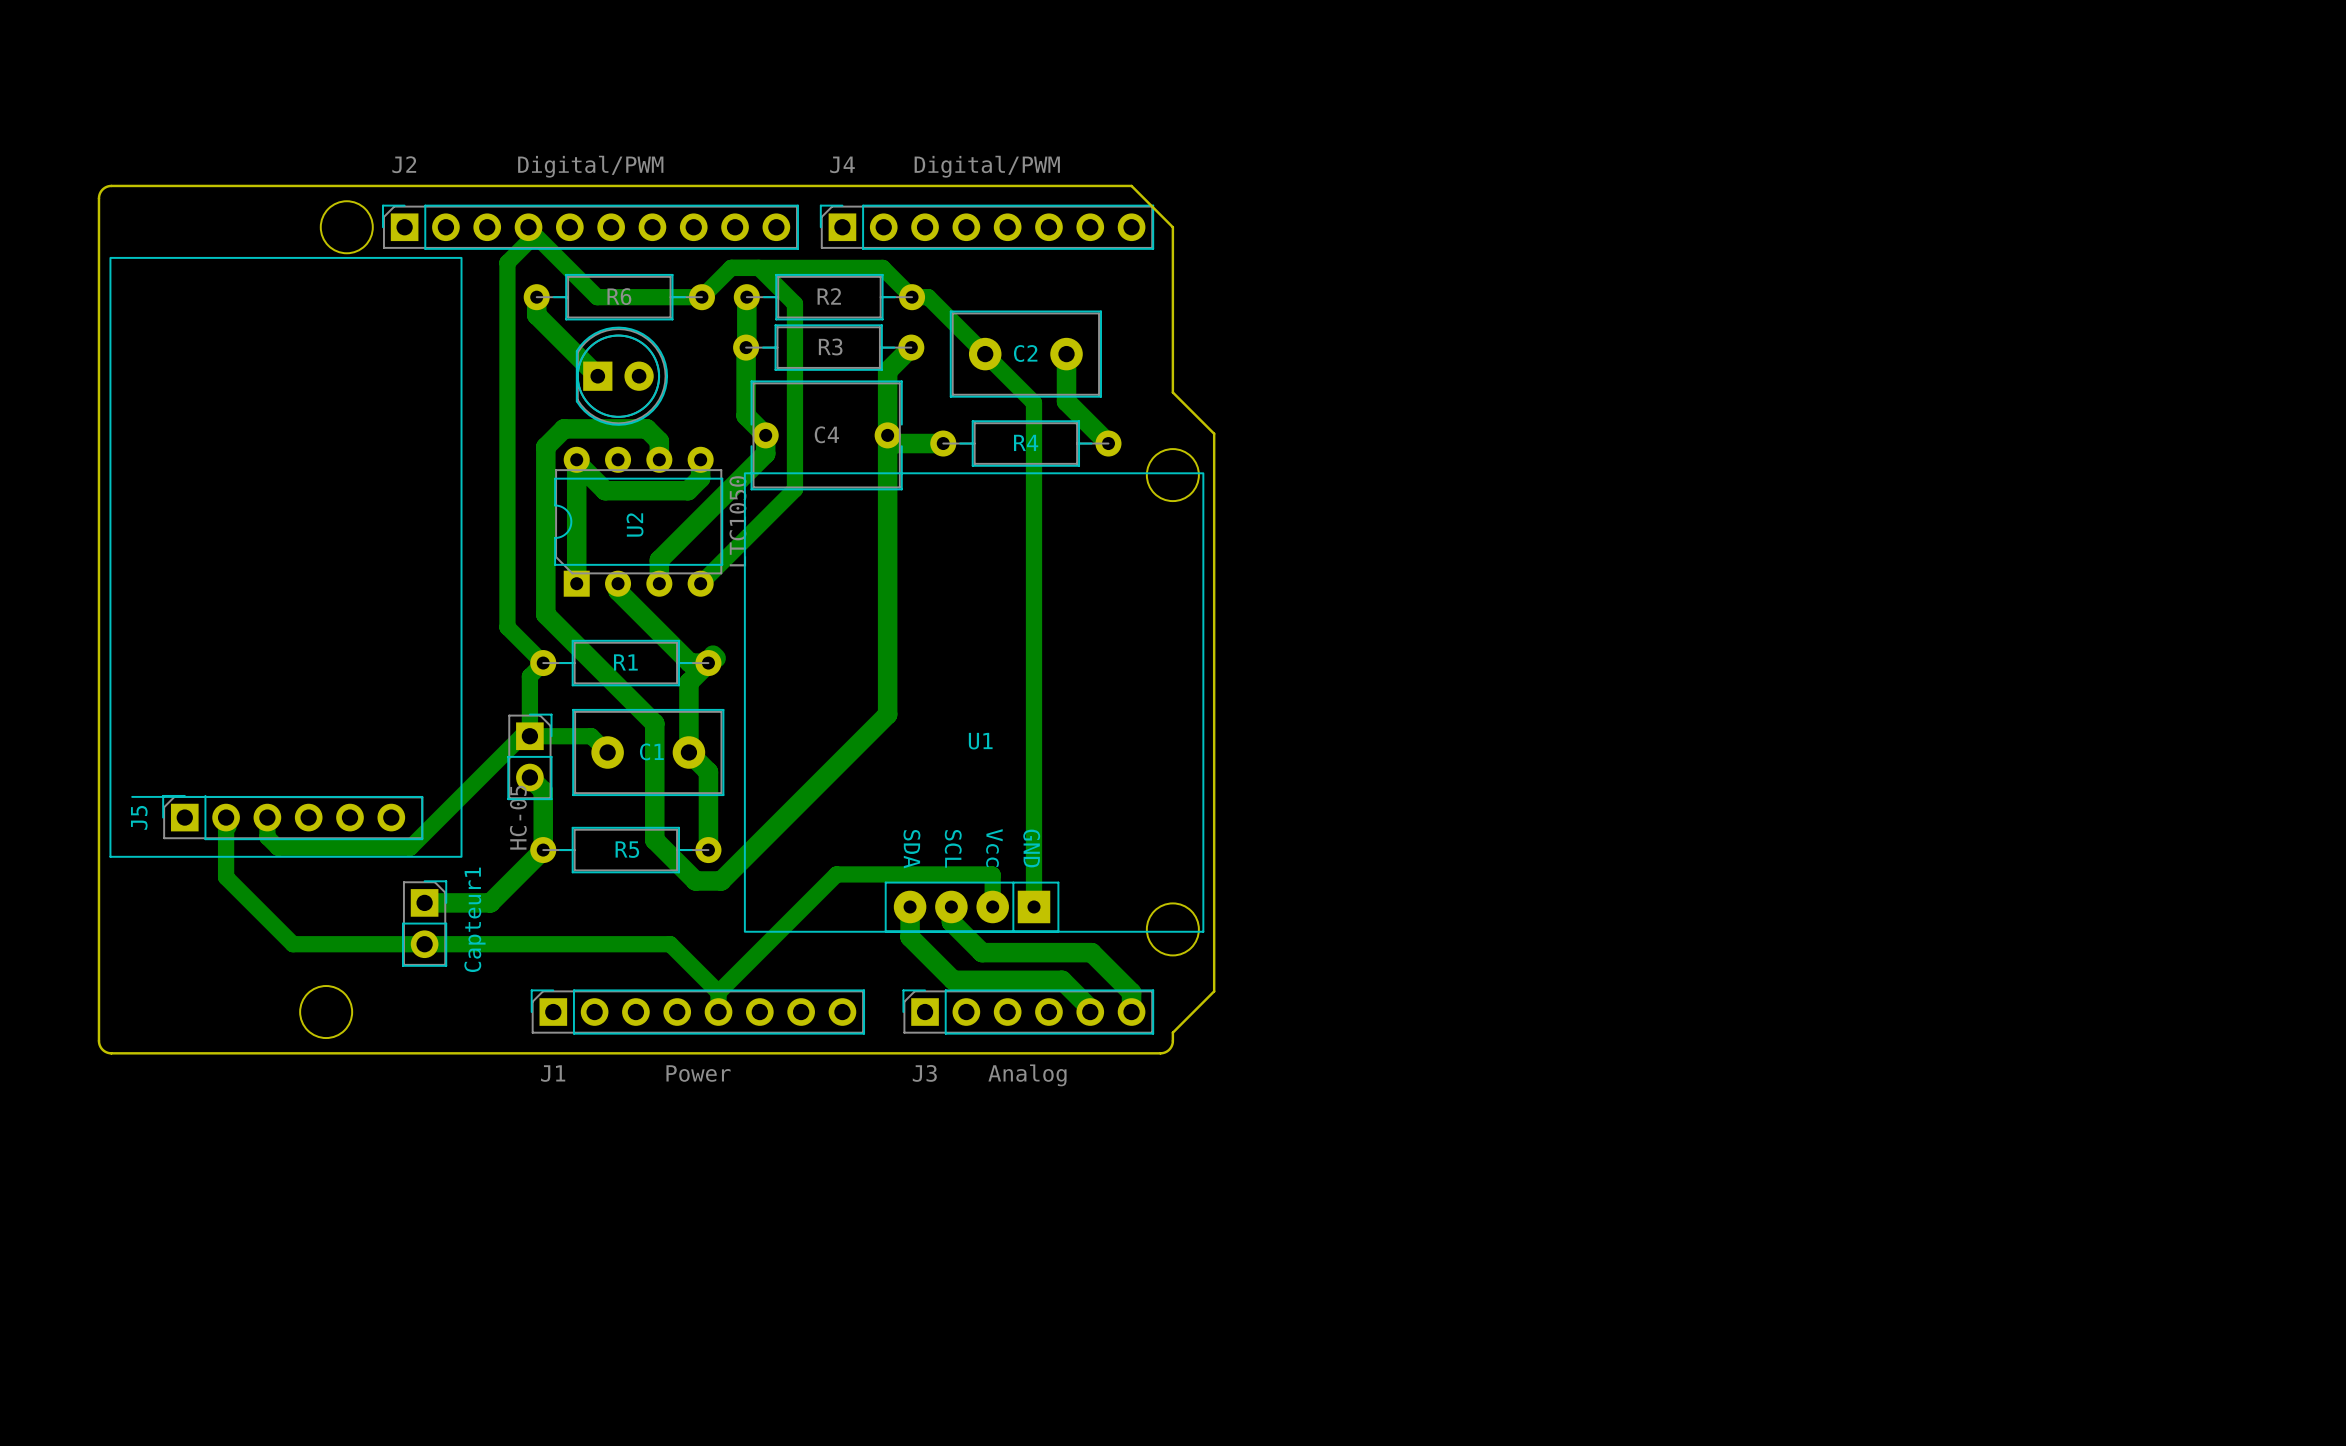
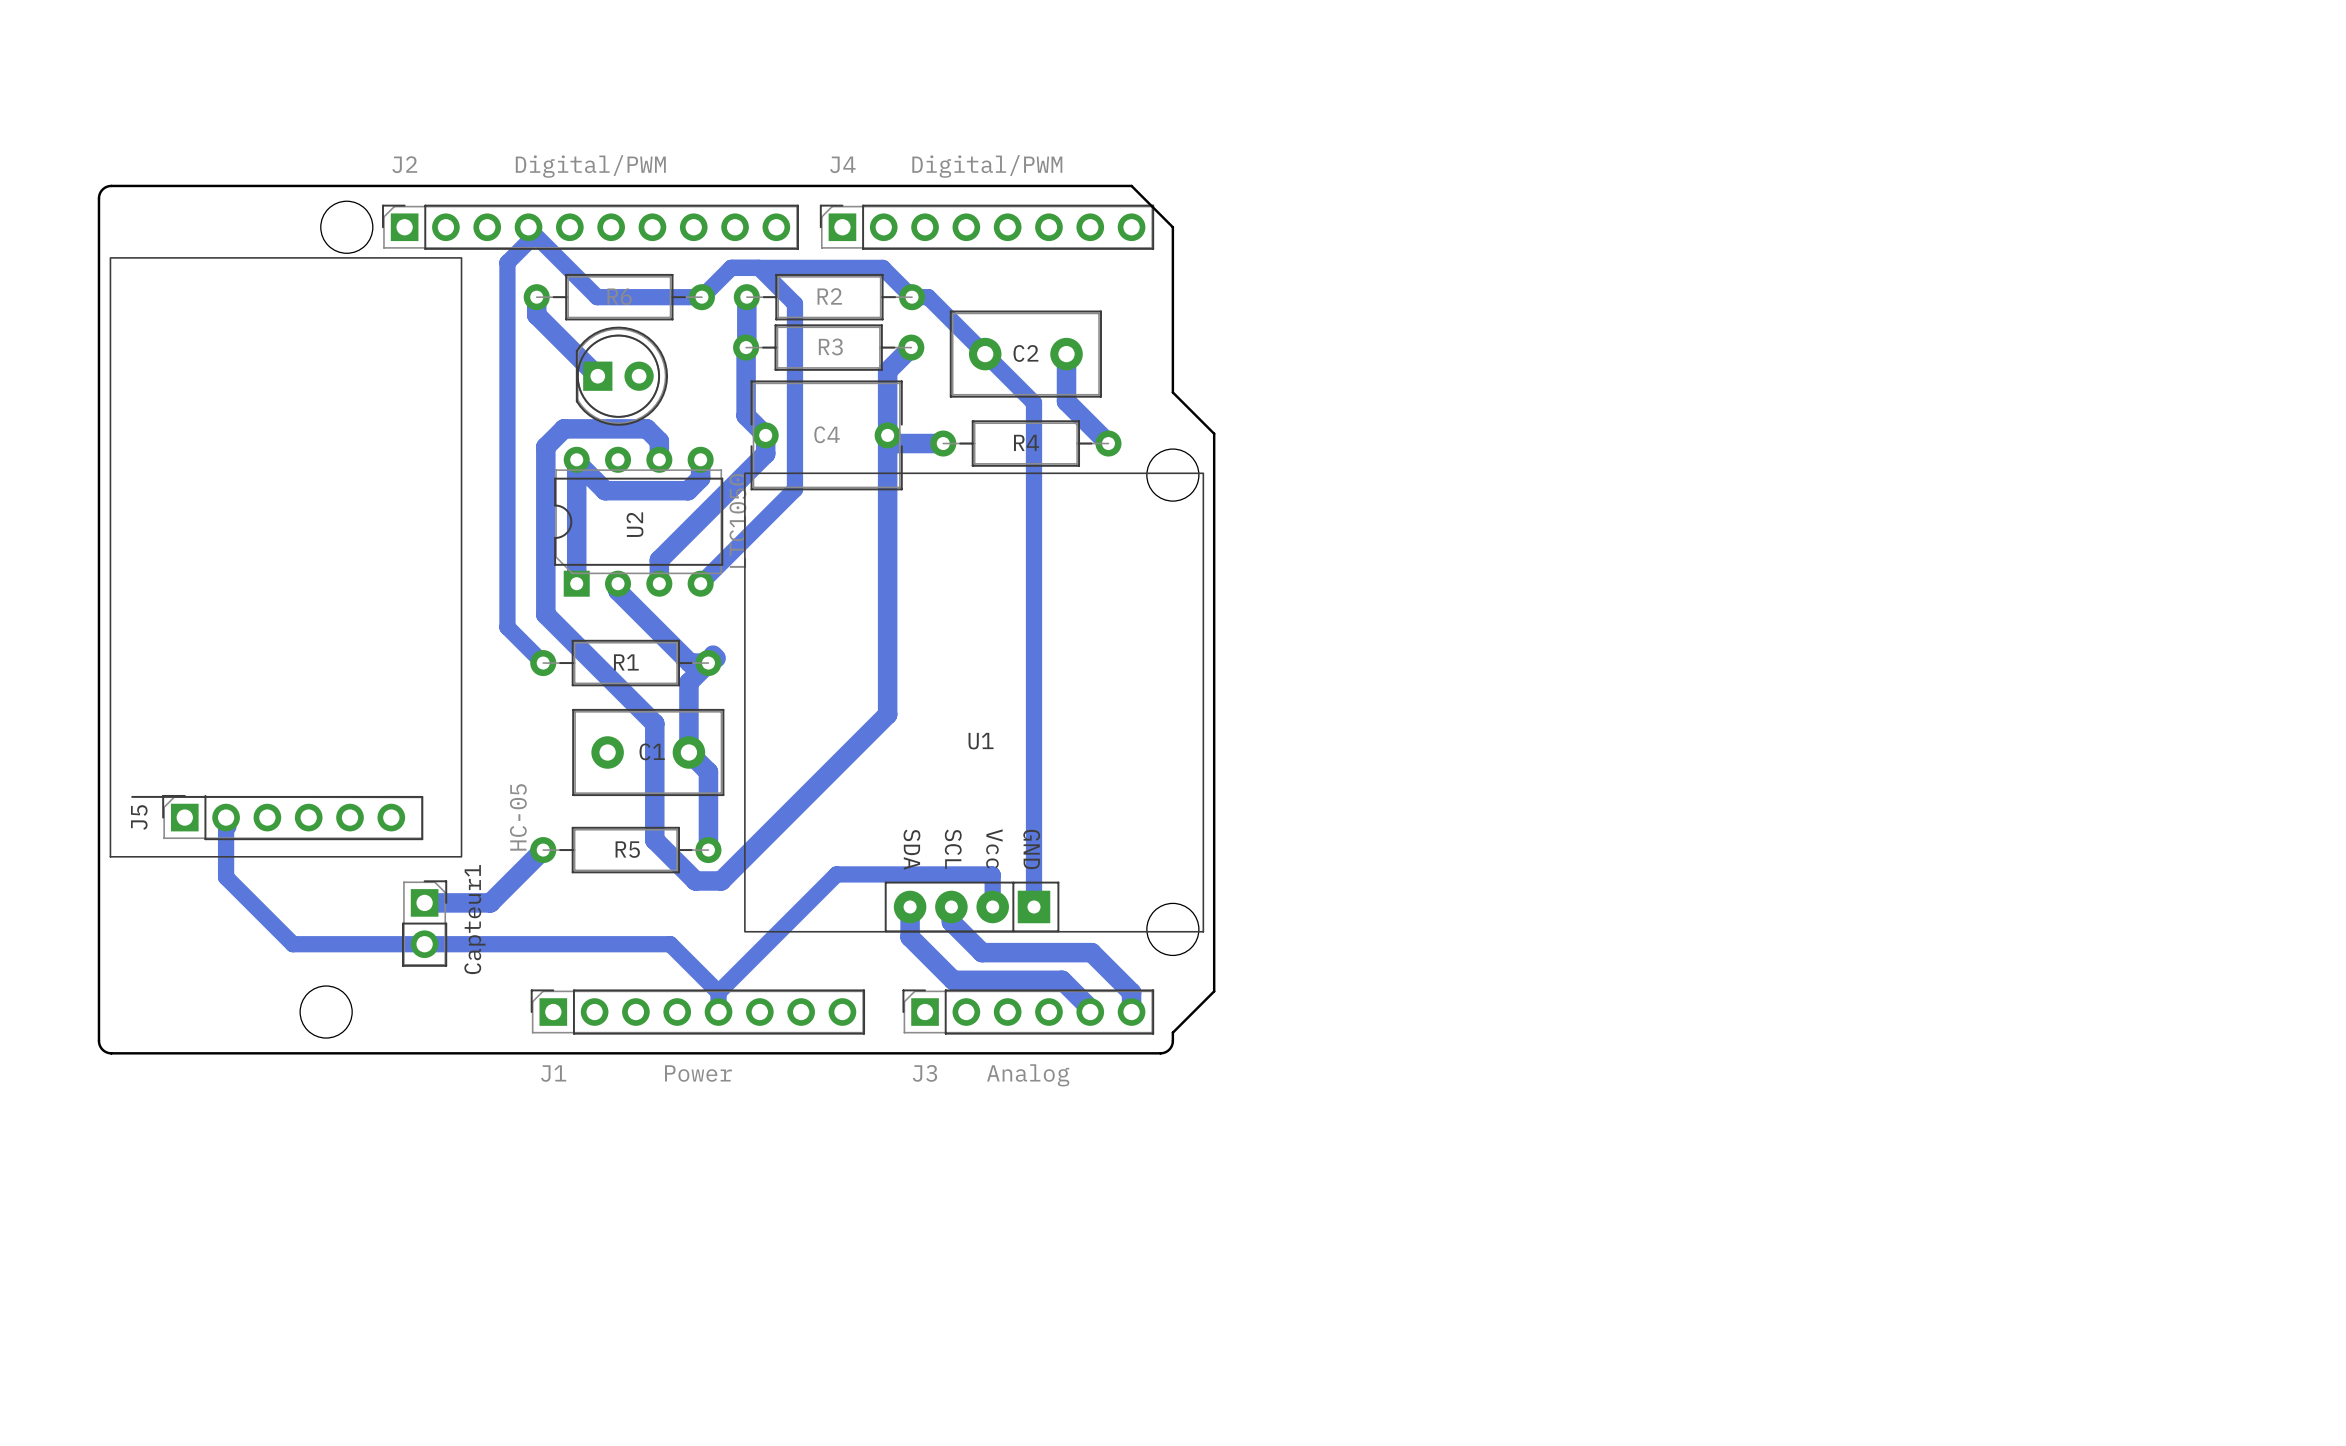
bottom track: (543, 663) (529, 676) (529, 736) -> none
bottom track: (607, 752) (591, 736) (521, 736) (410, 847) (277, 847) (267, 837) (267, 817) -> none
part: (529, 756) -> none
bottom track: (529, 777) (543, 790) (543, 850) -> none

